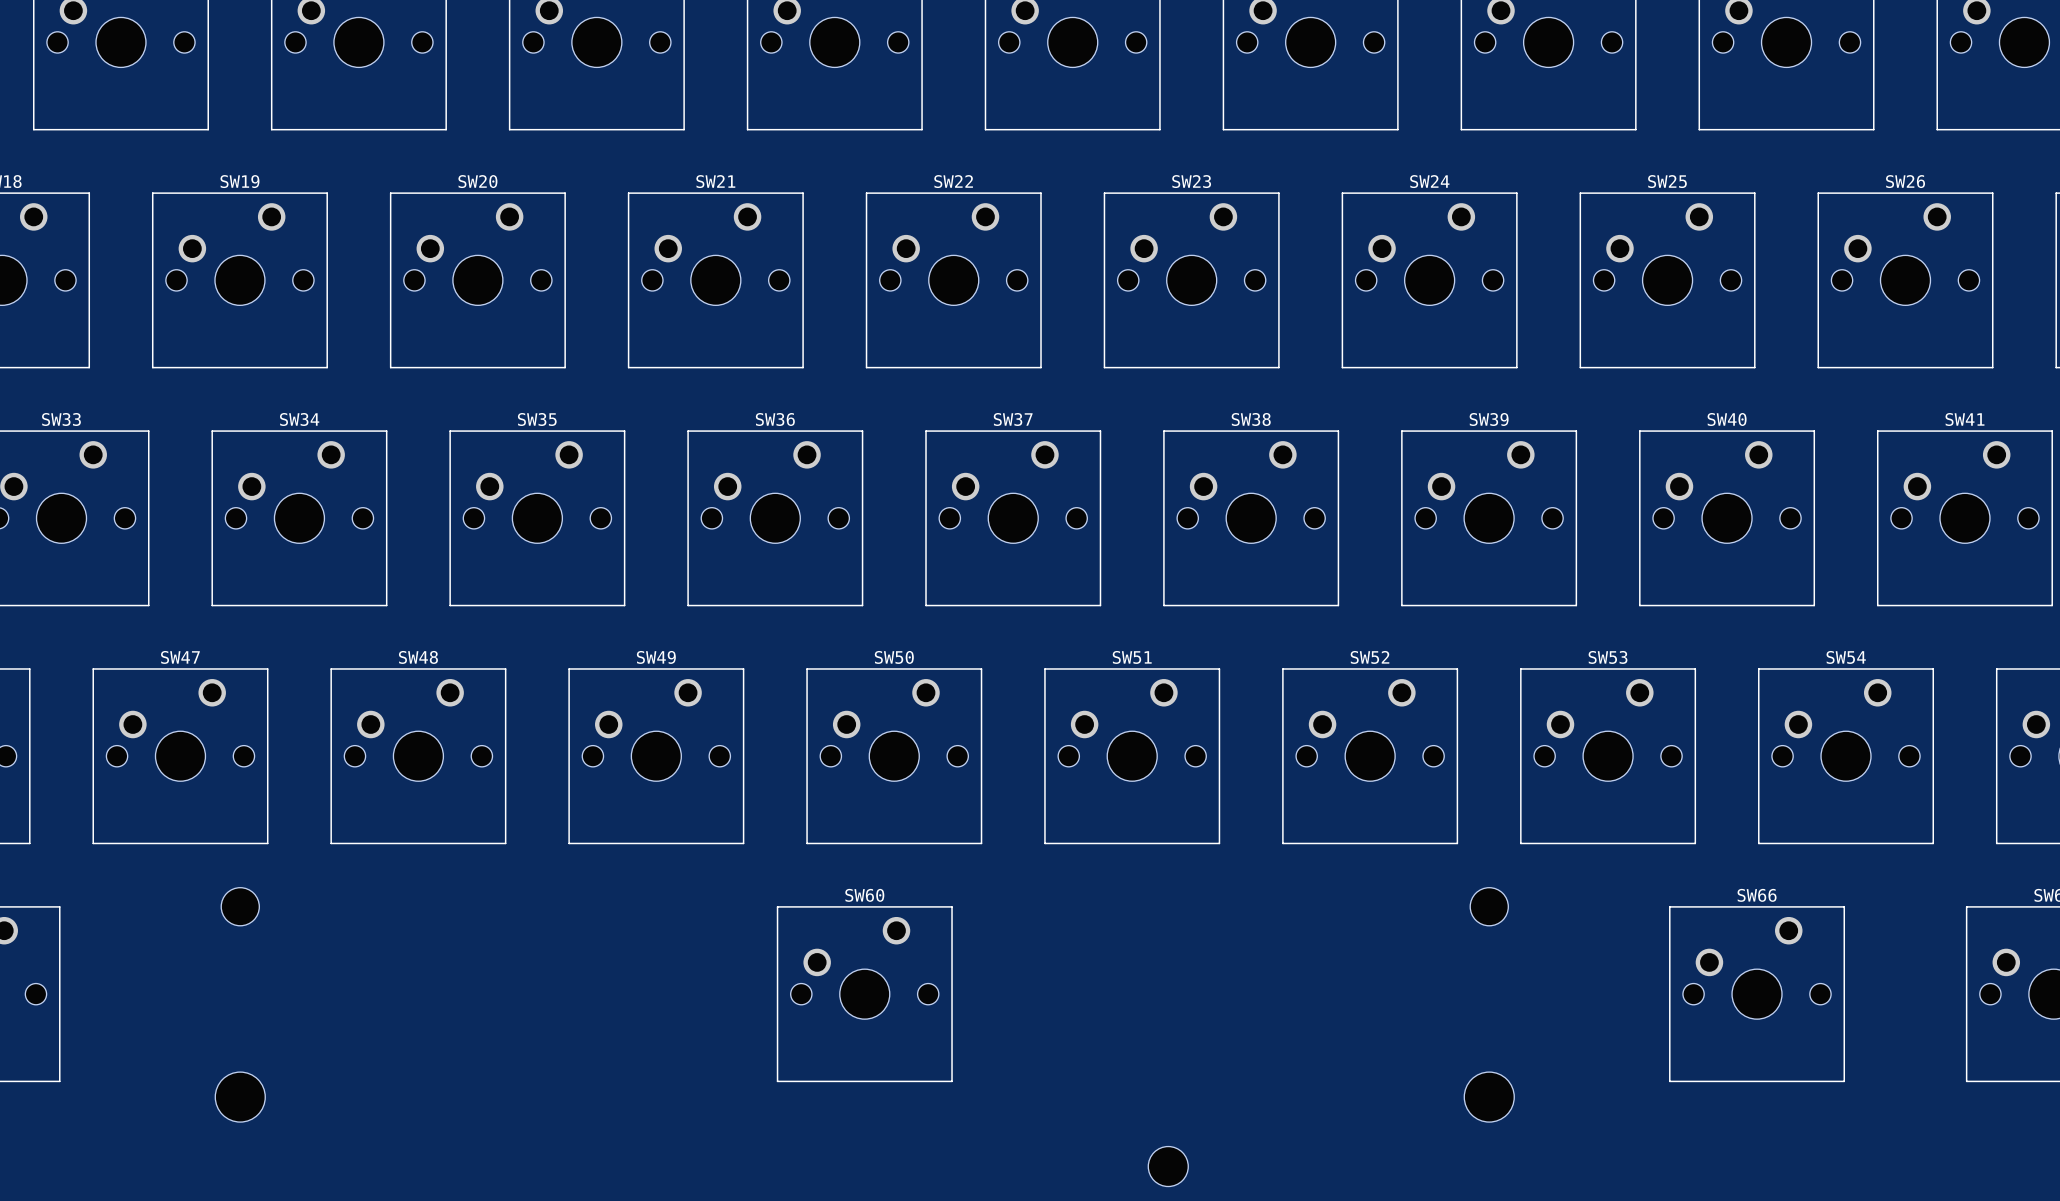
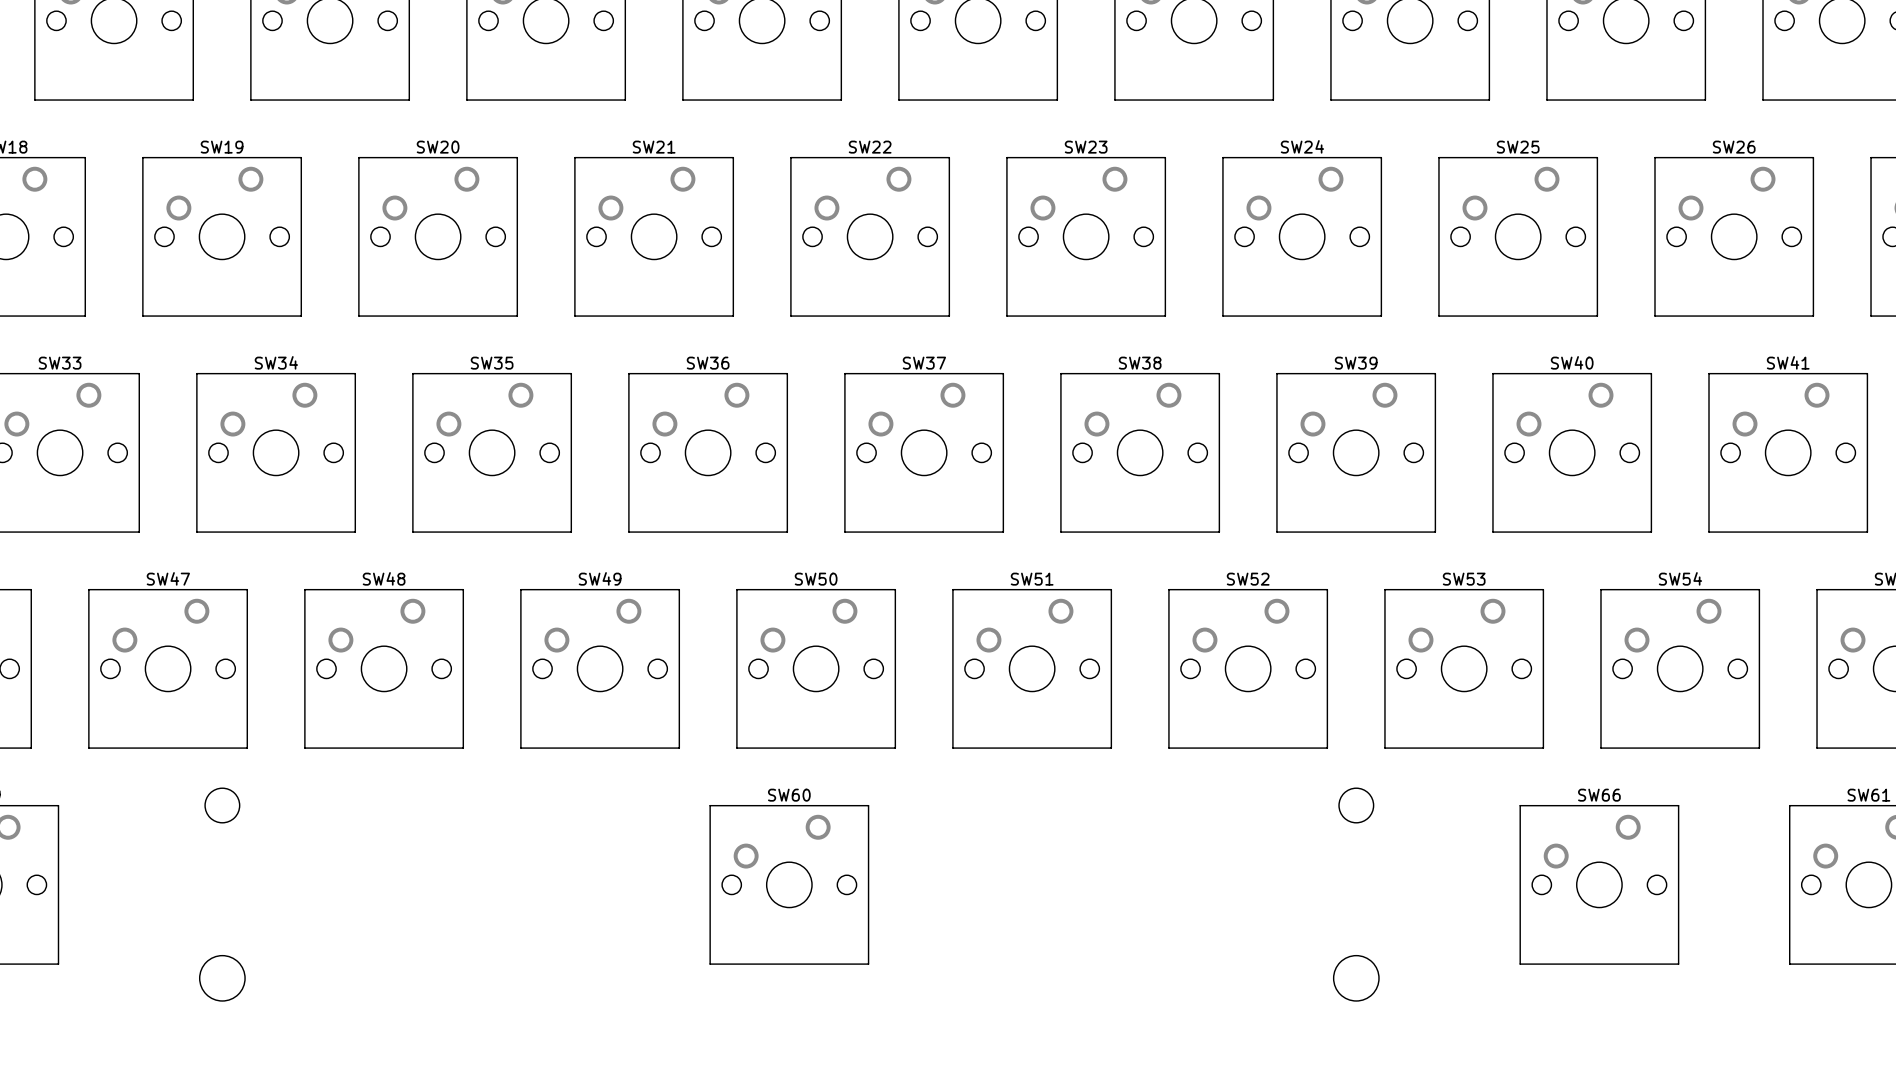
part: (1168, 1166) -> none

